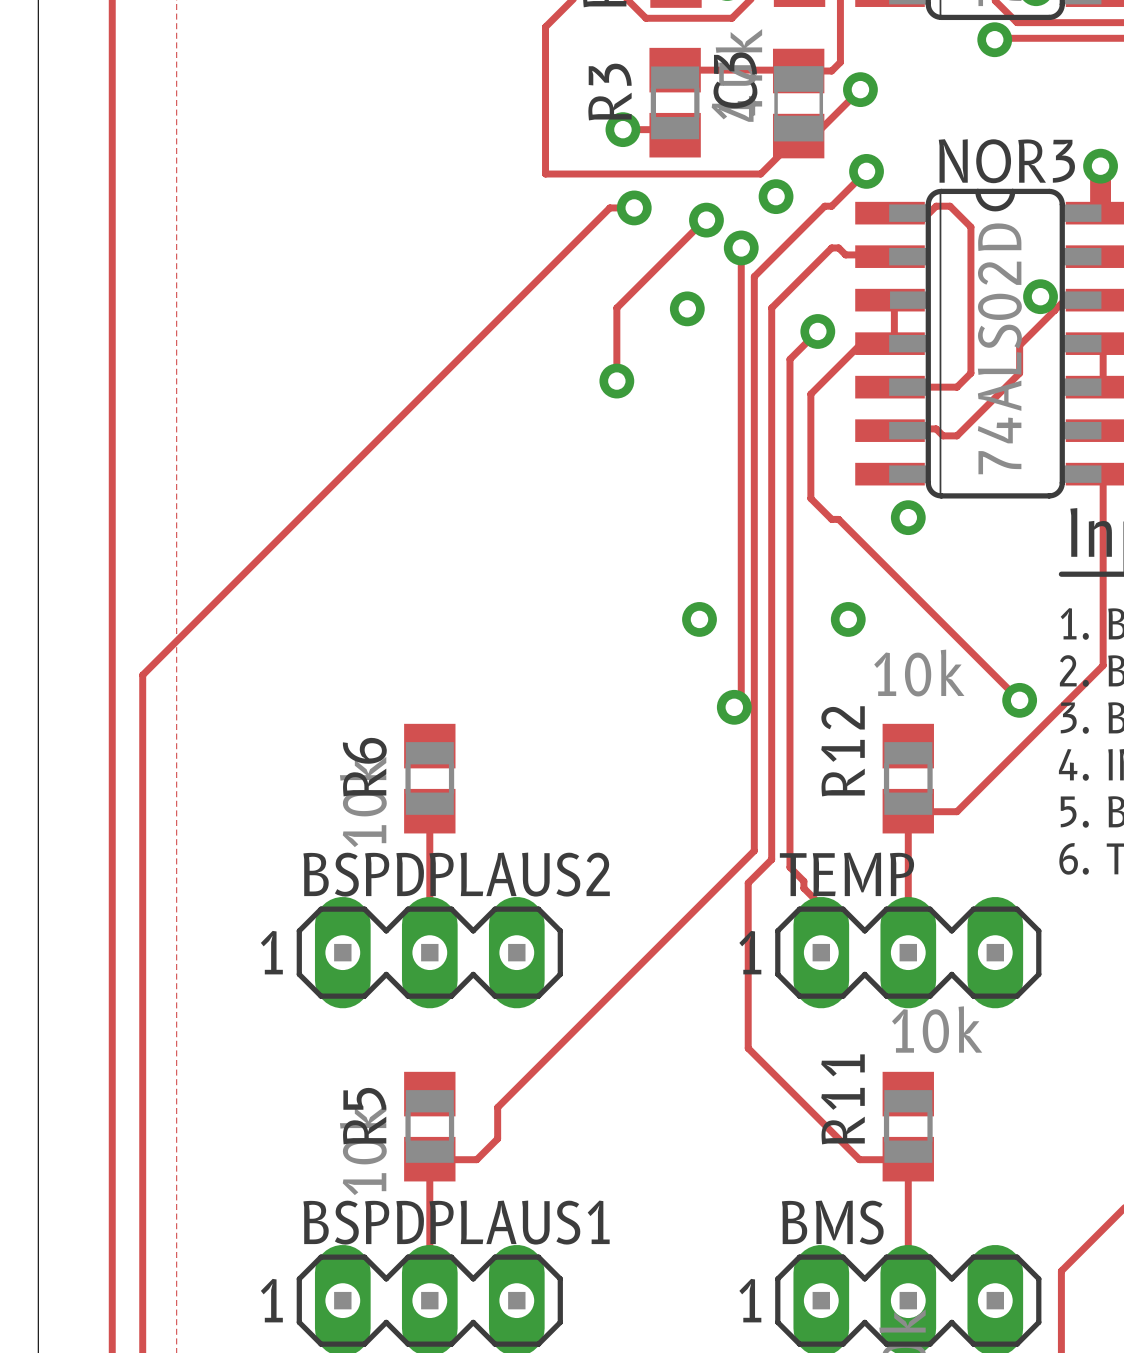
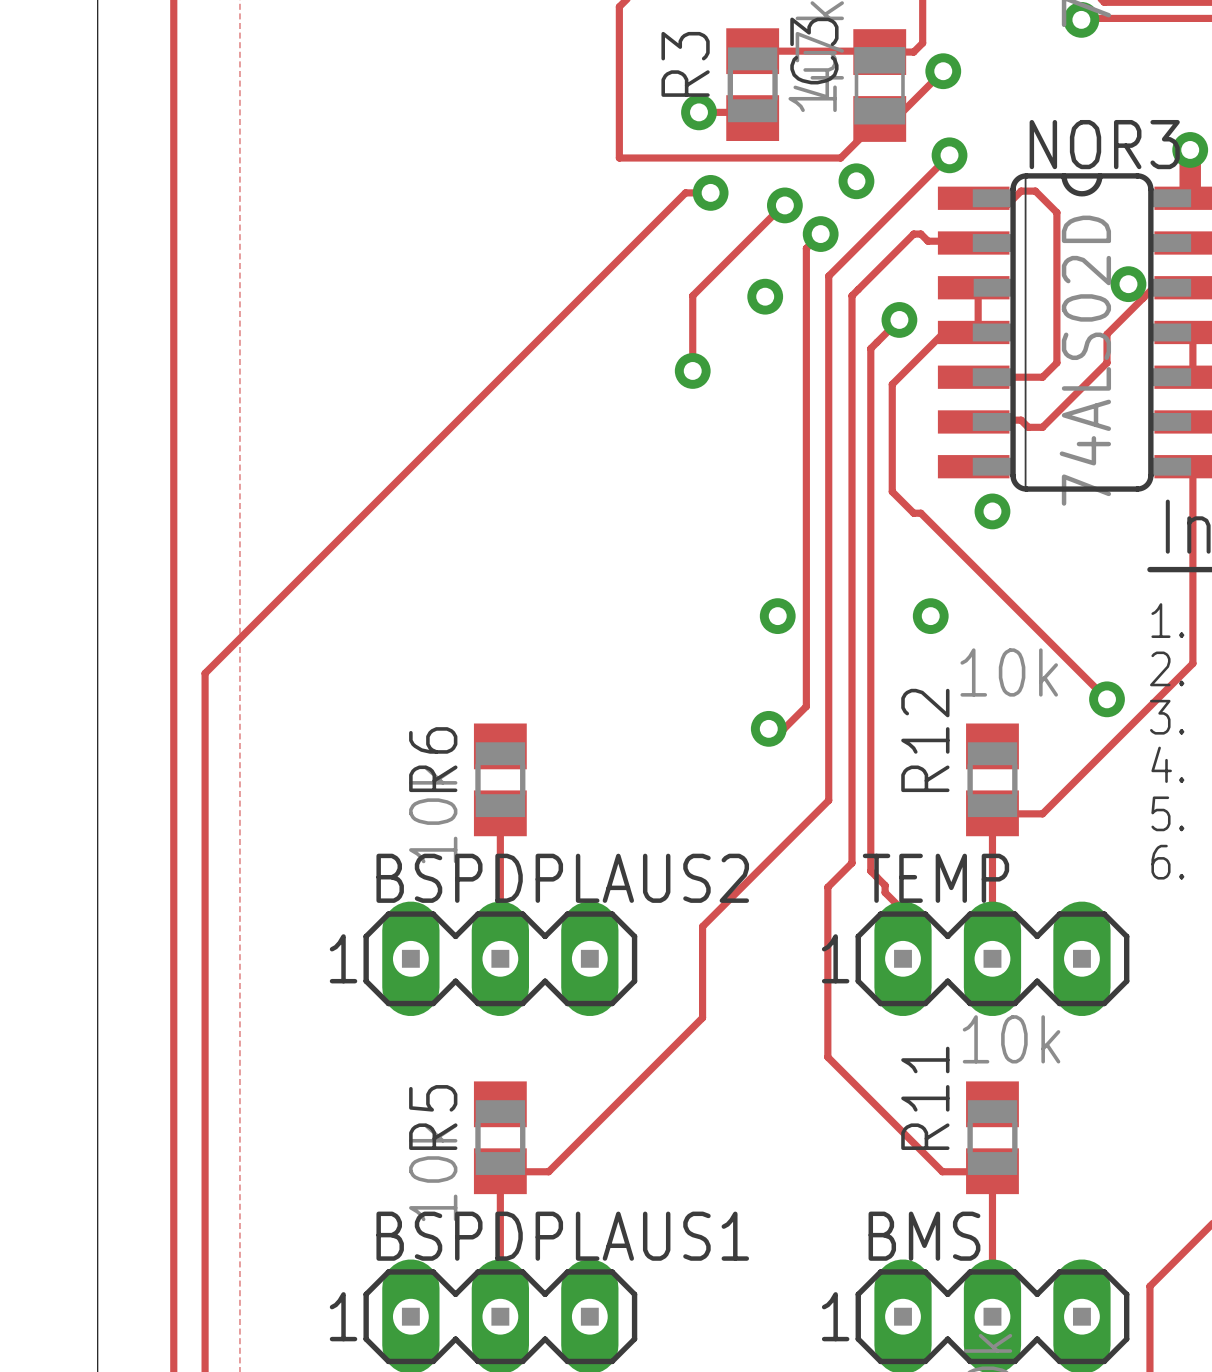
track: (831, 206) (824, 206) (754, 276) (754, 850) (497, 1107) (497, 1138) -> (913, 191) (828, 276) (828, 800) (702, 926) (702, 1017) (570, 1150)
track: (741, 247) (741, 700) (734, 707) -> (820, 234) (806, 248) (806, 706) (784, 728) (768, 728)
via position: (734, 707) -> (768, 728)

